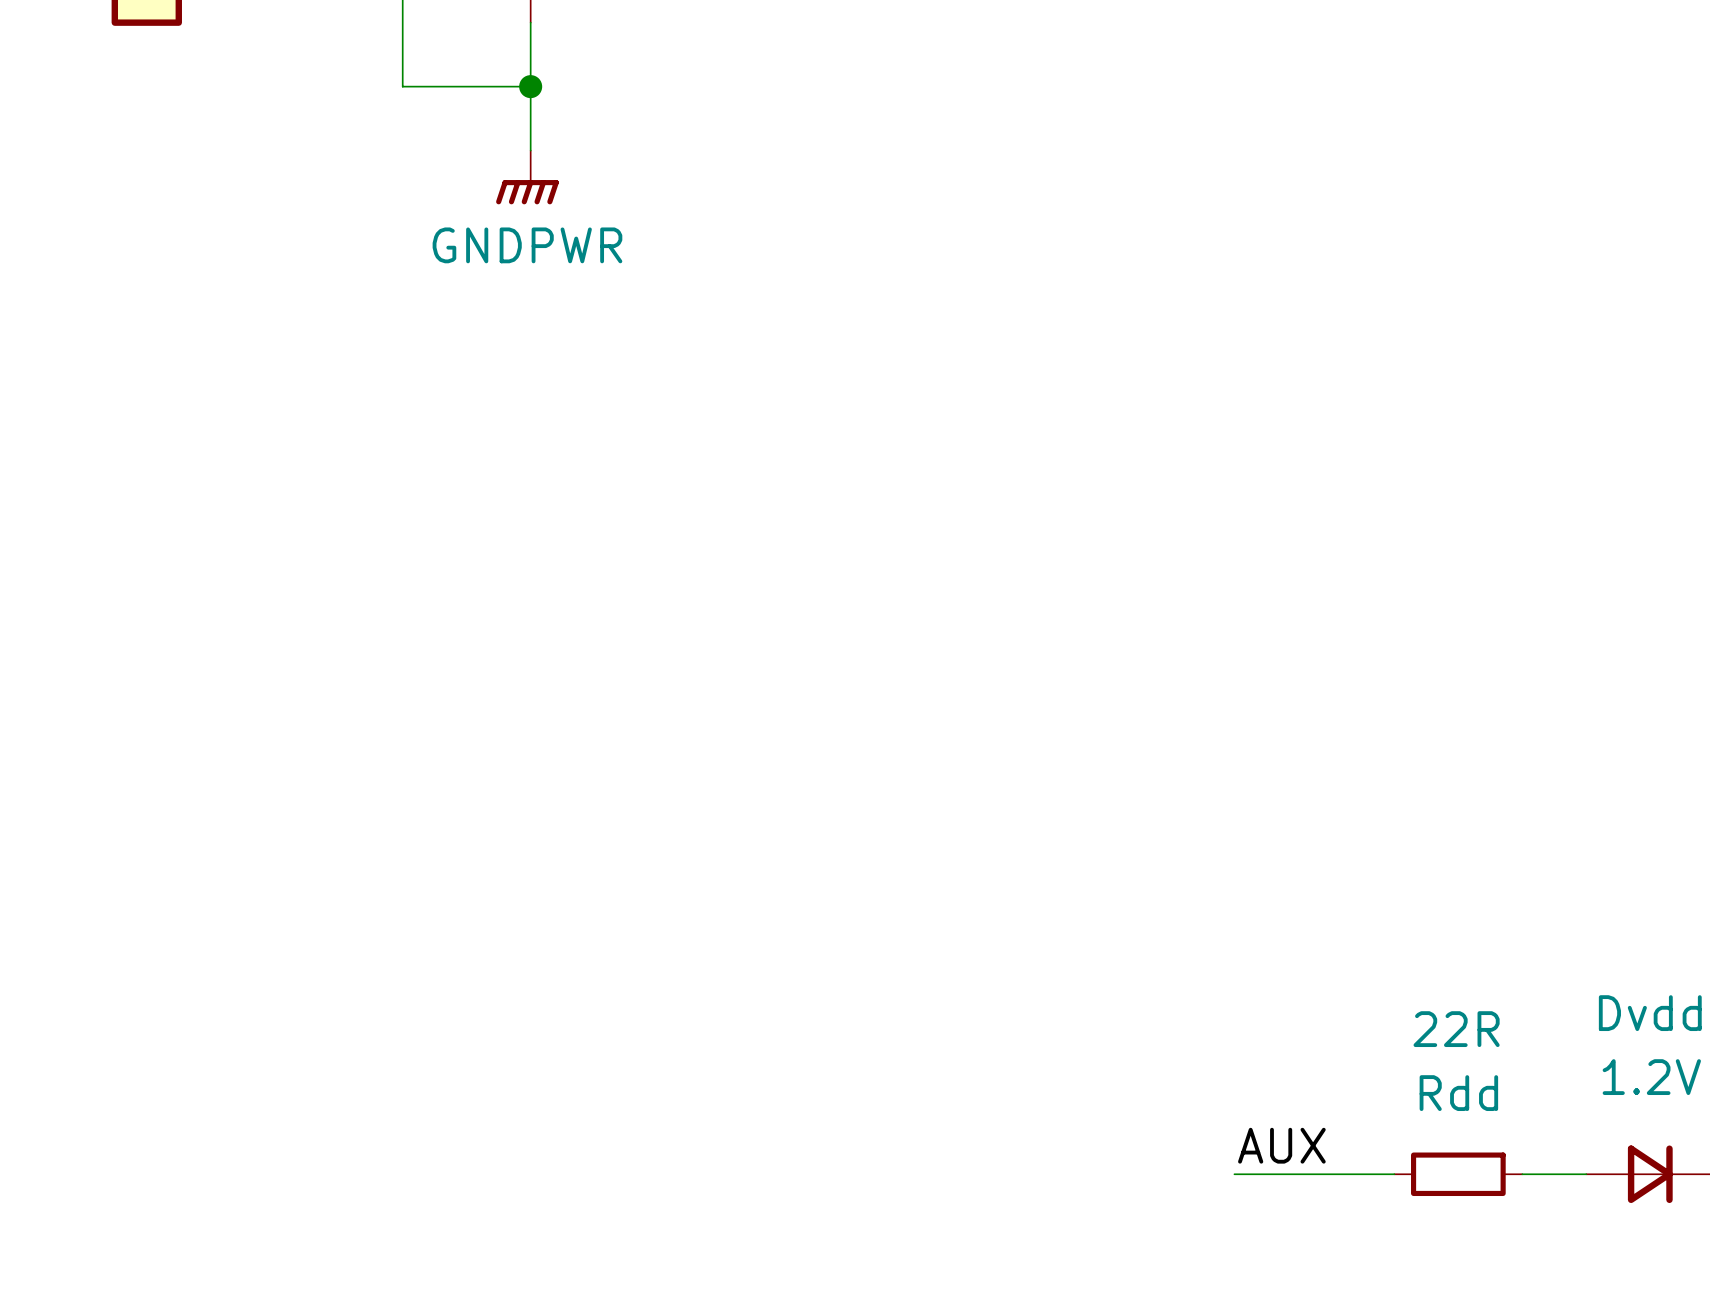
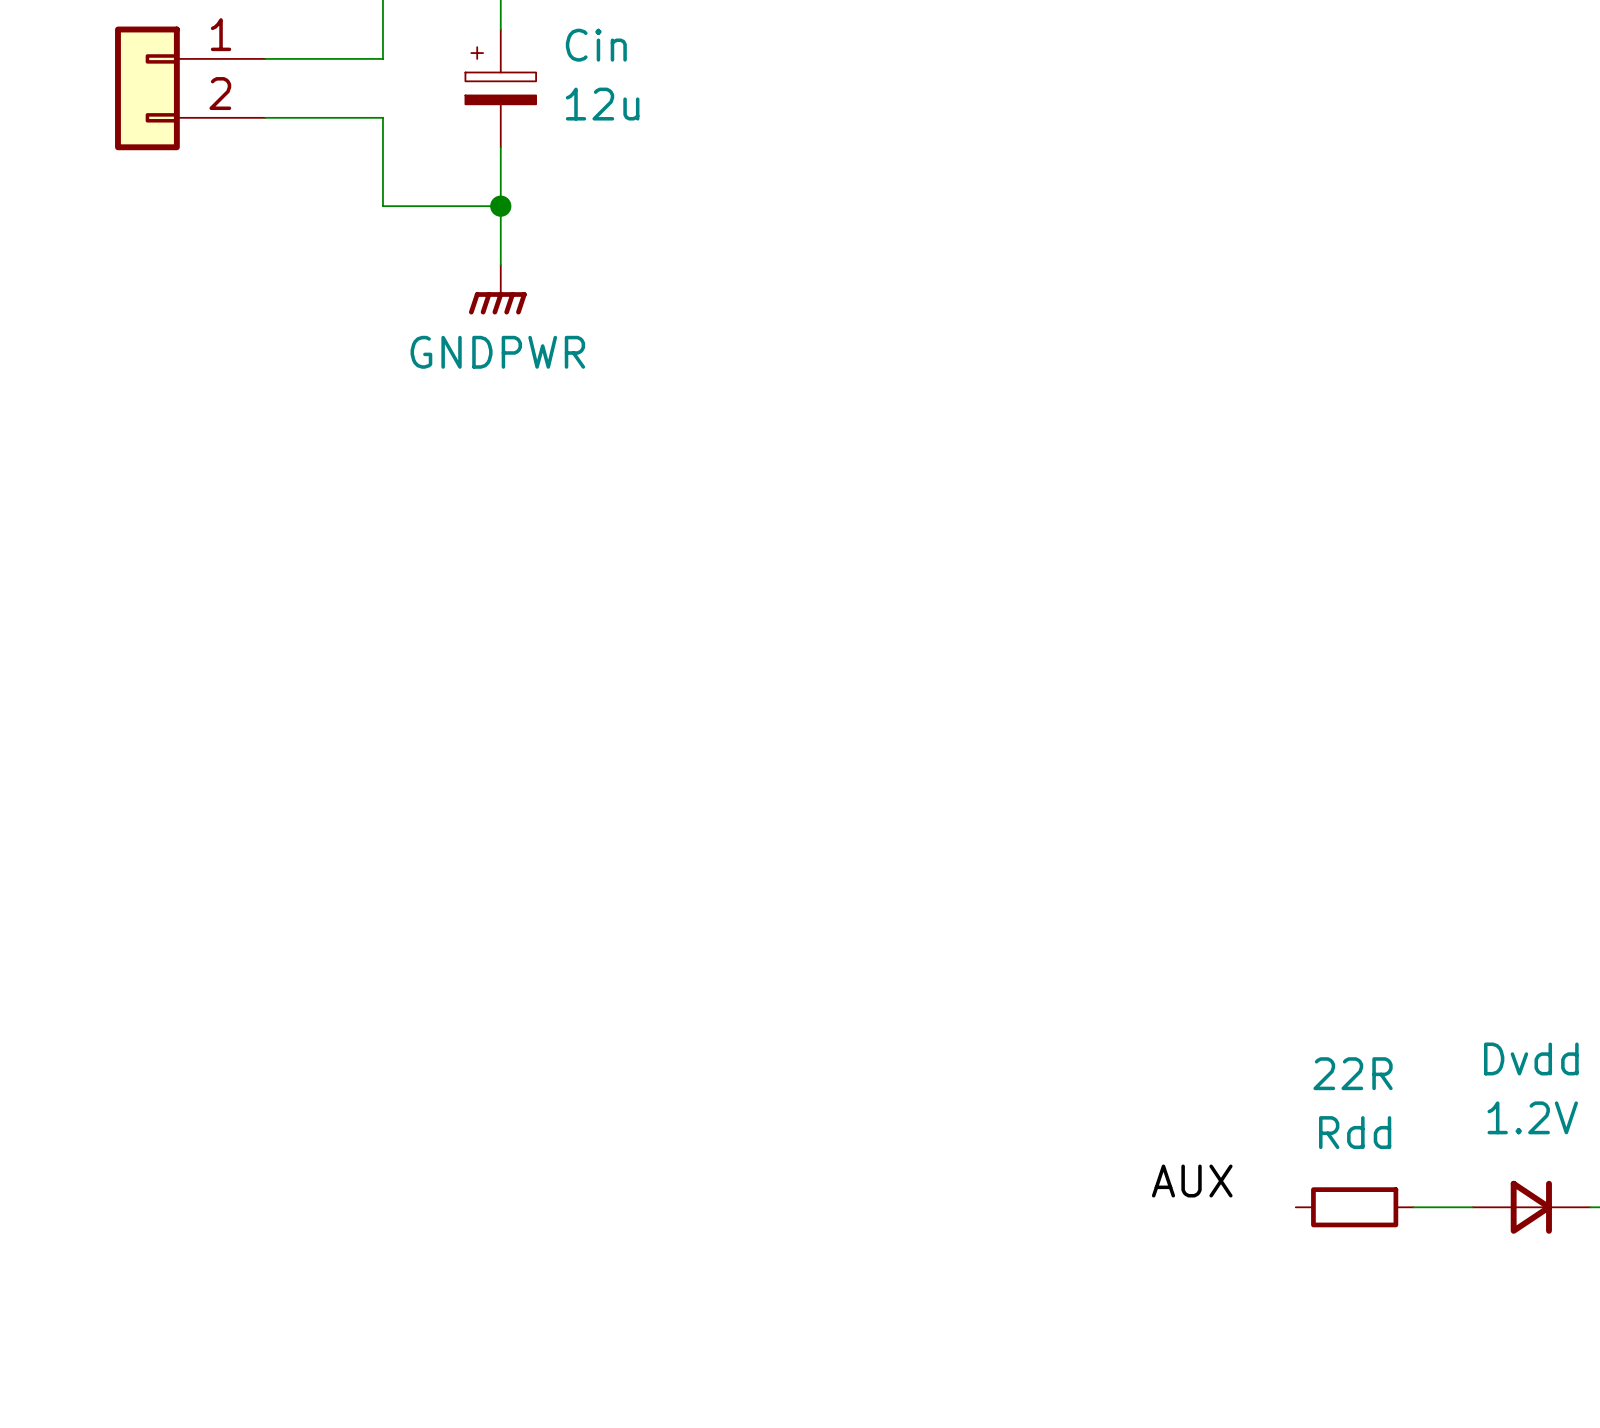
wire: (1234, 1174) (1394, 1174) -> none

